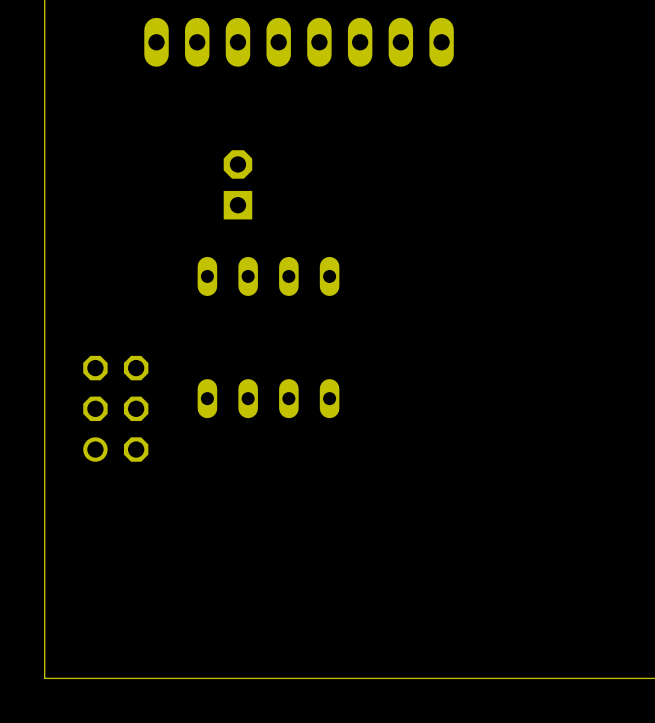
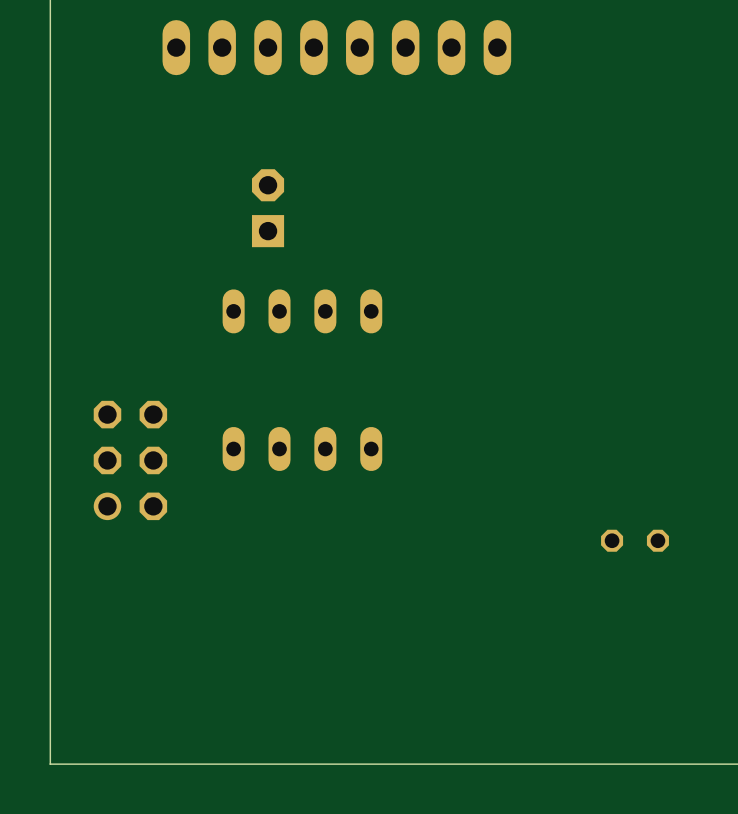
part: none -> (635, 540)

